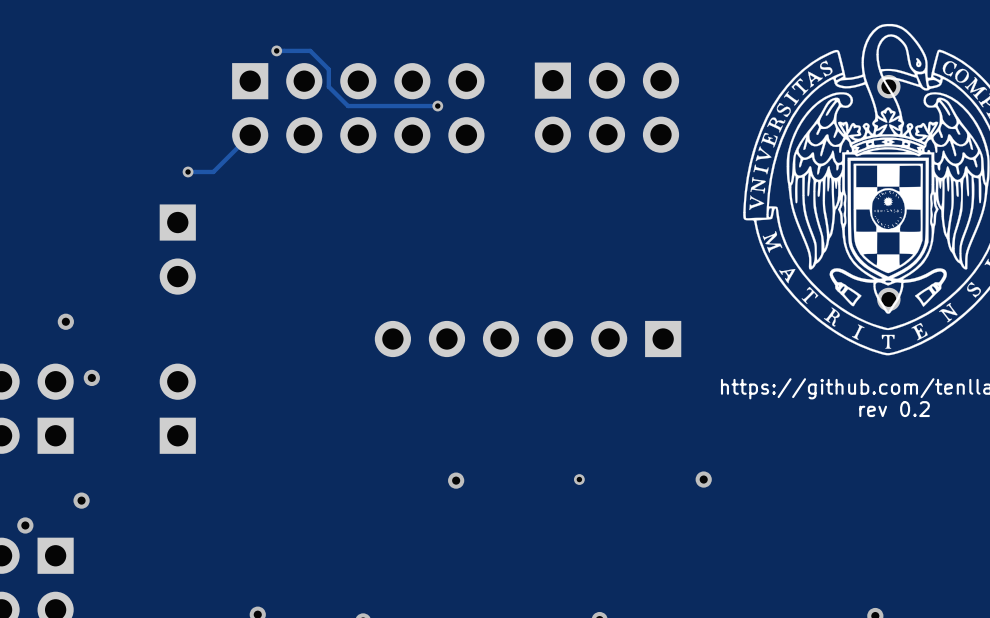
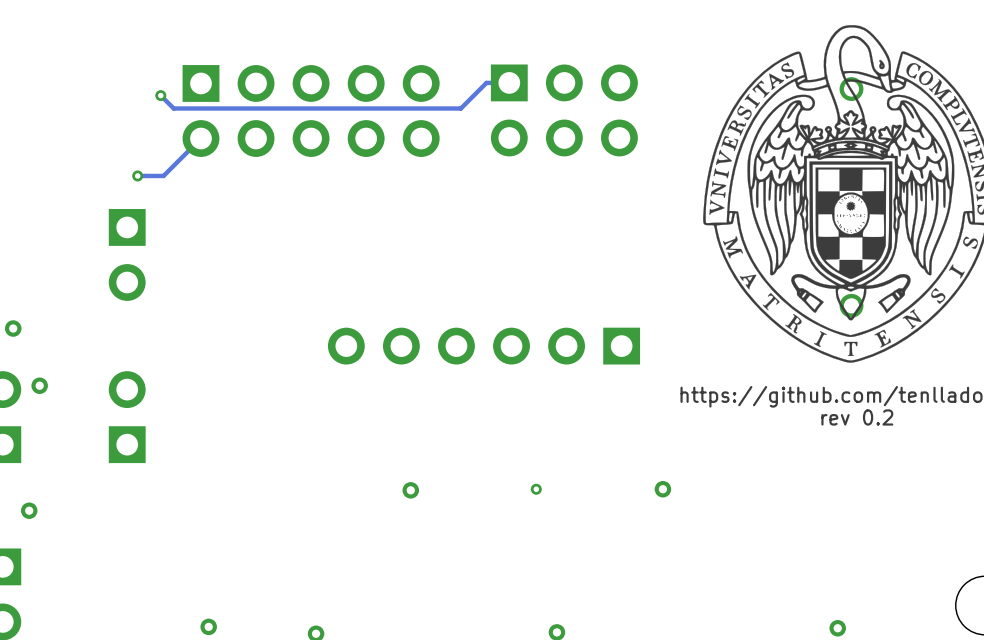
track: (276, 50) (310, 50) (328, 69) (328, 86) (348, 106) (437, 106) -> none
via: (276, 50) -> none
track: none -> (509, 82) (486, 82) (460, 108) (173, 108) (160, 95)
via: none -> (160, 95)
via: (437, 106) -> none

